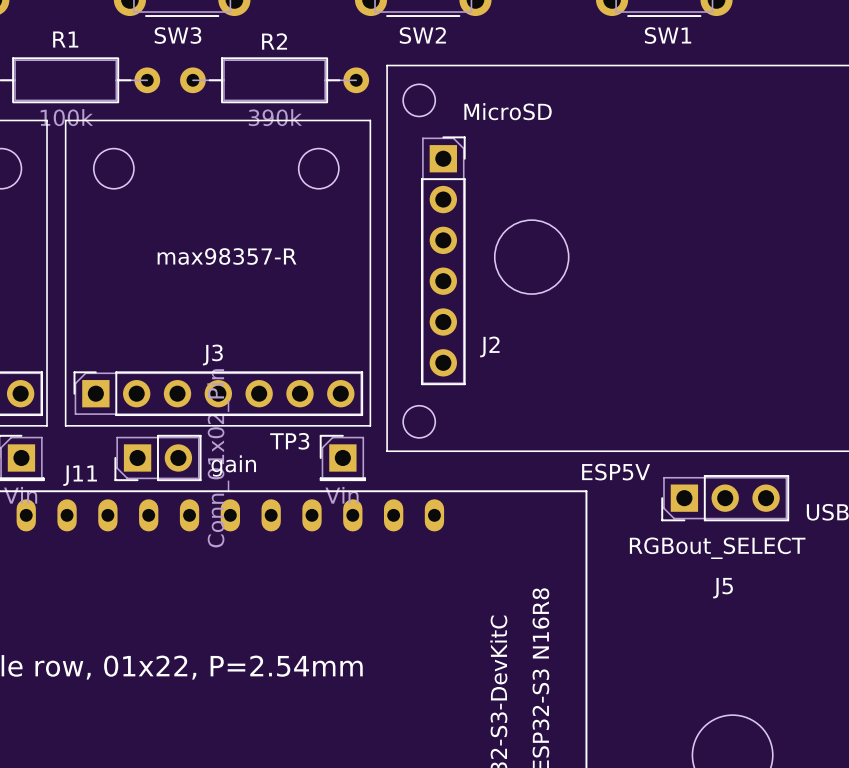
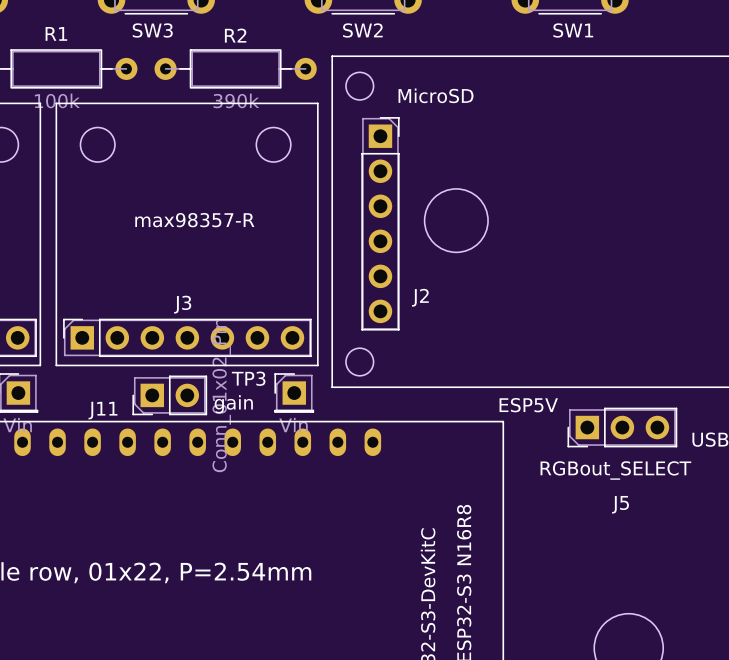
J11 position: (157, 457) -> (169, 395)
text position: gain (233, 466) -> gain (233, 404)

